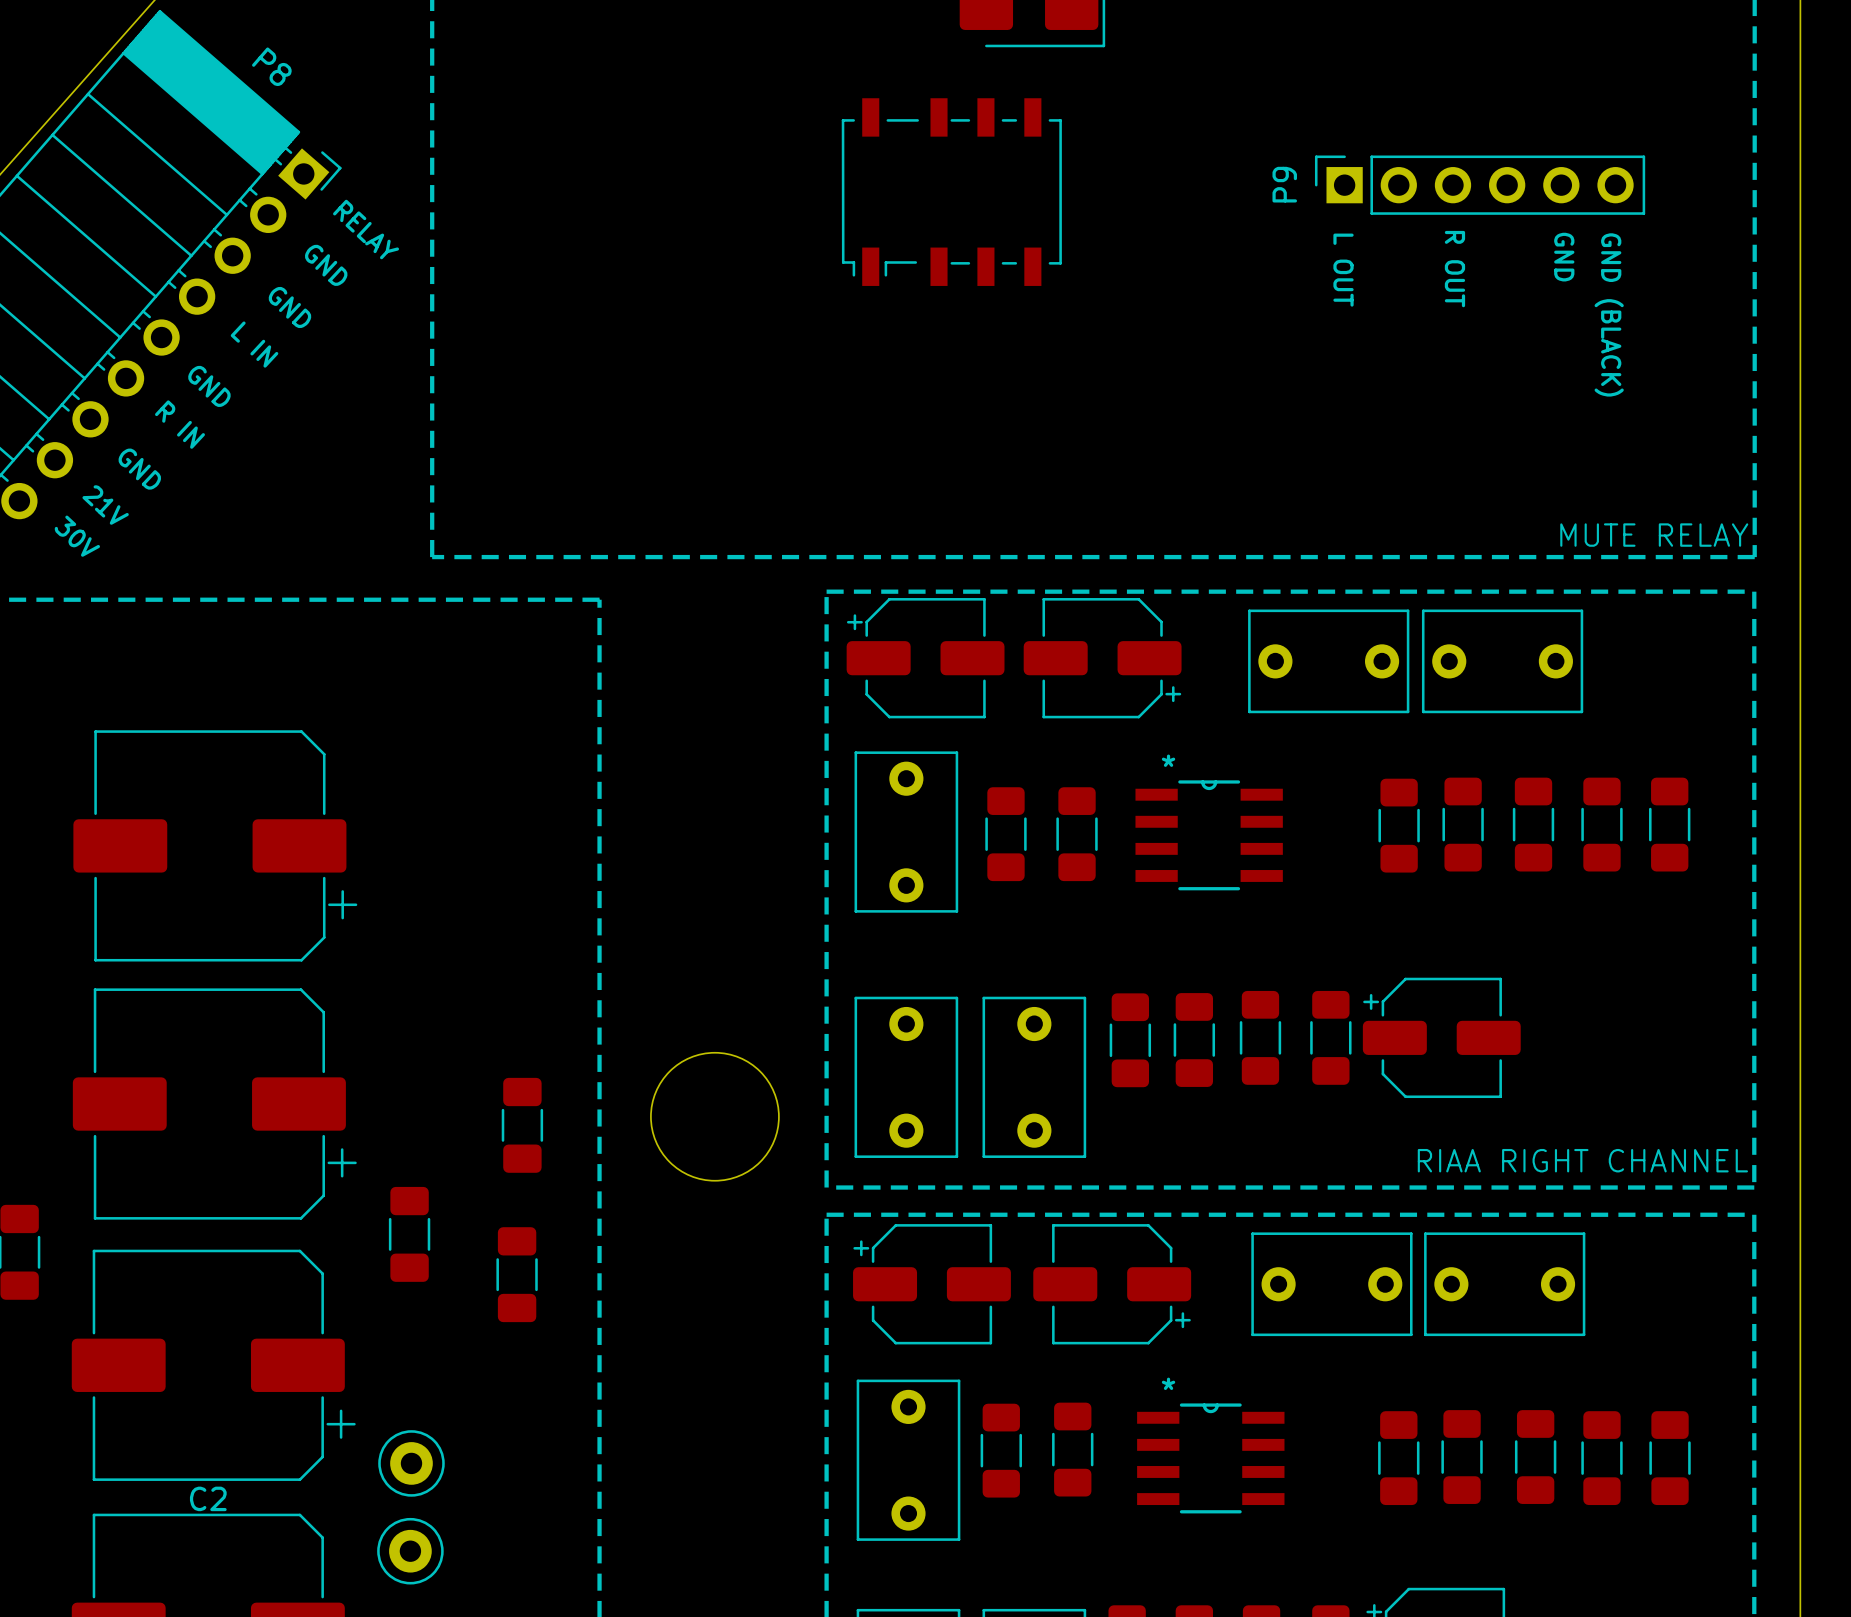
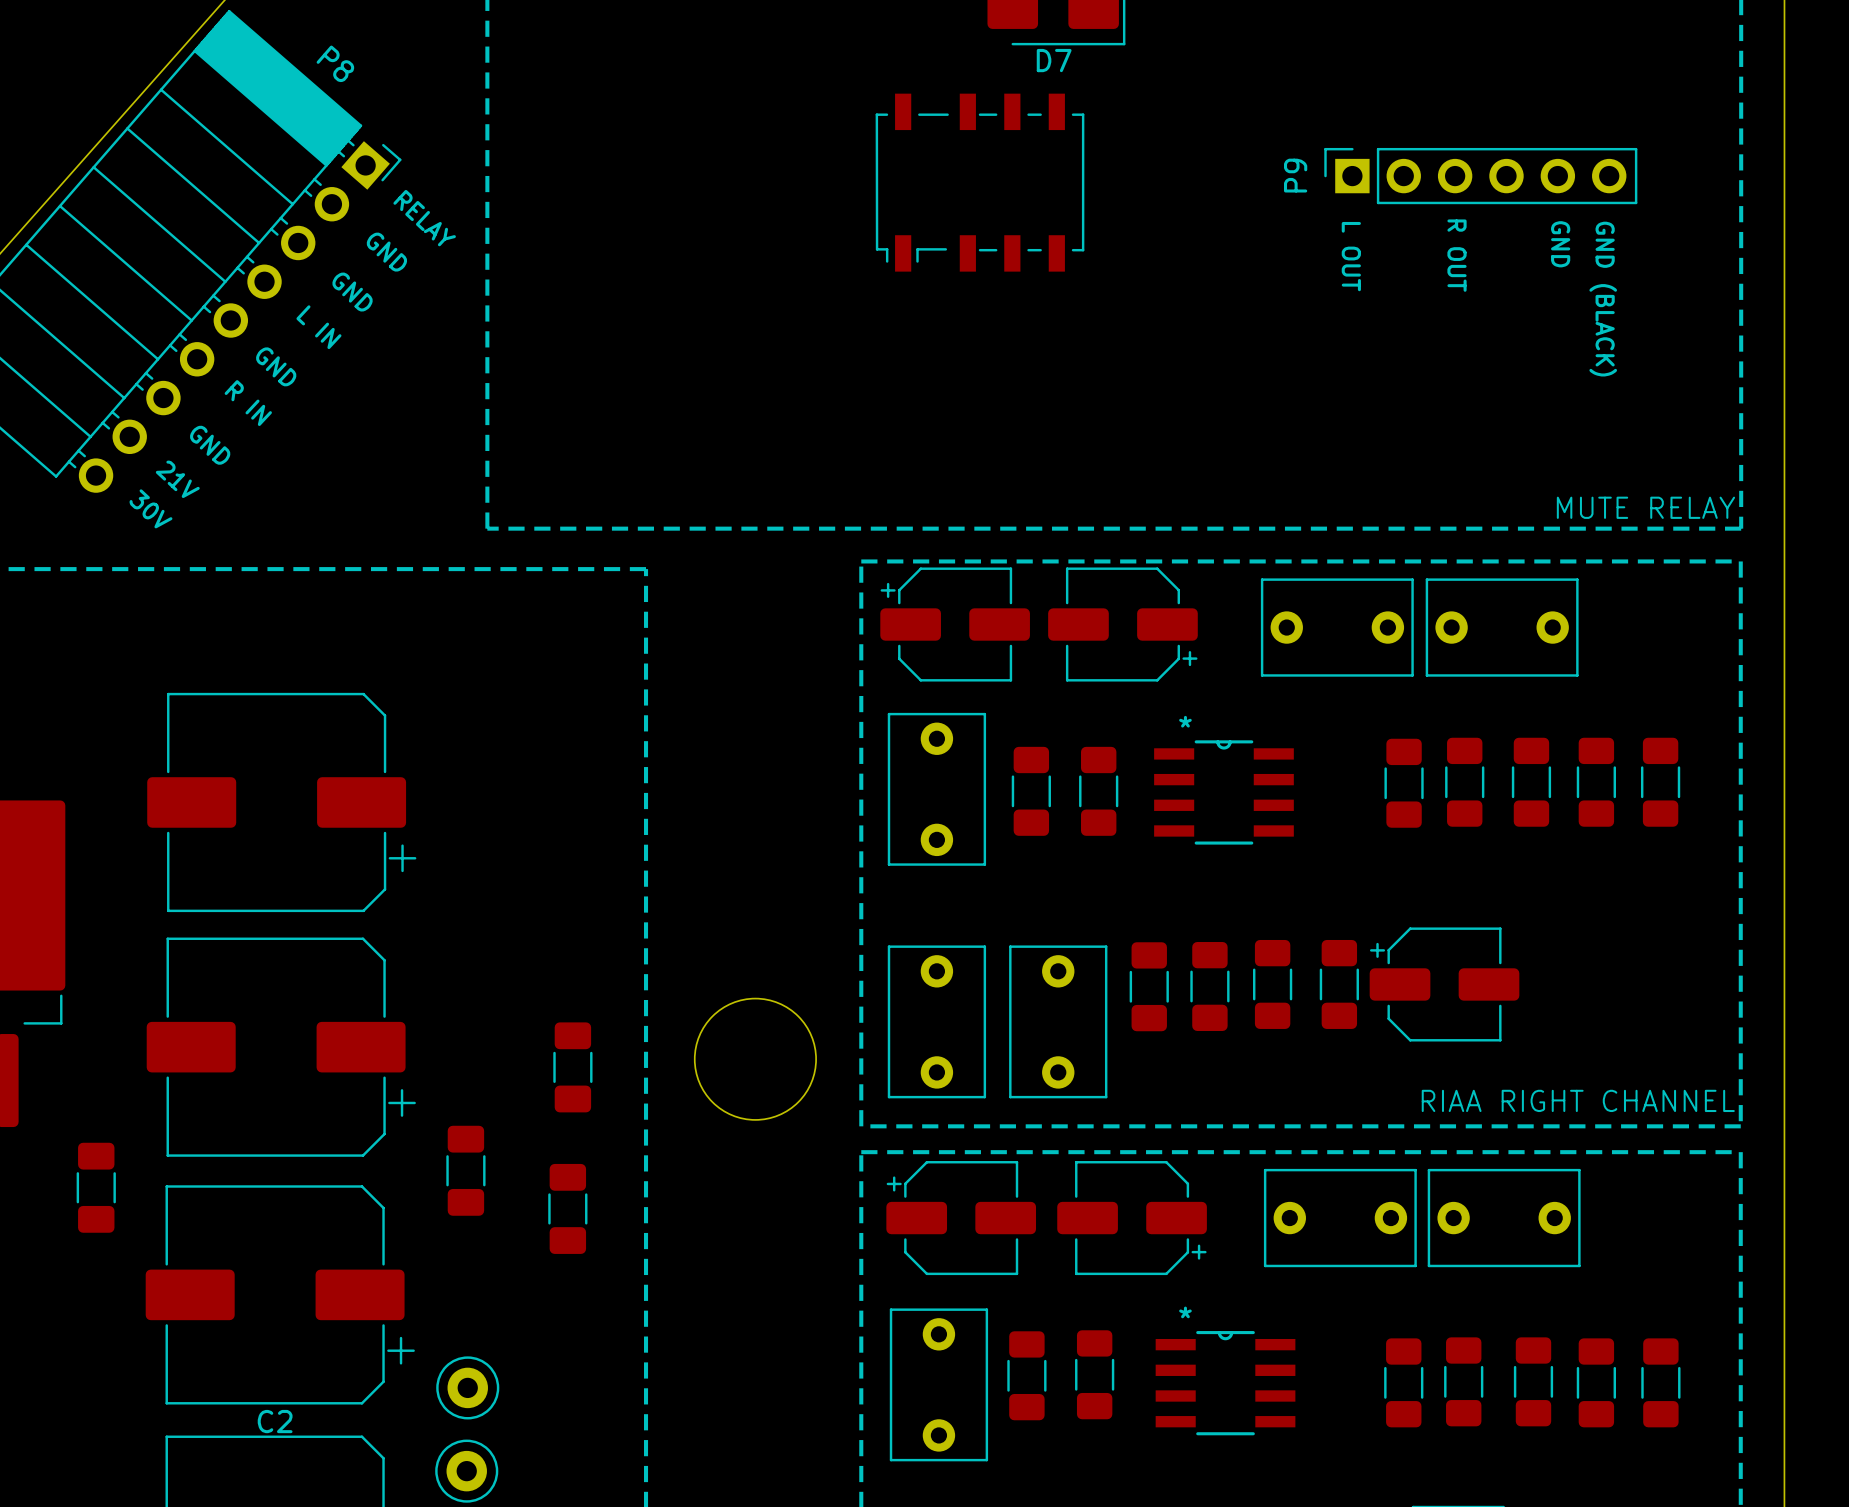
D7 name: none -> D7 (1054, 60)

